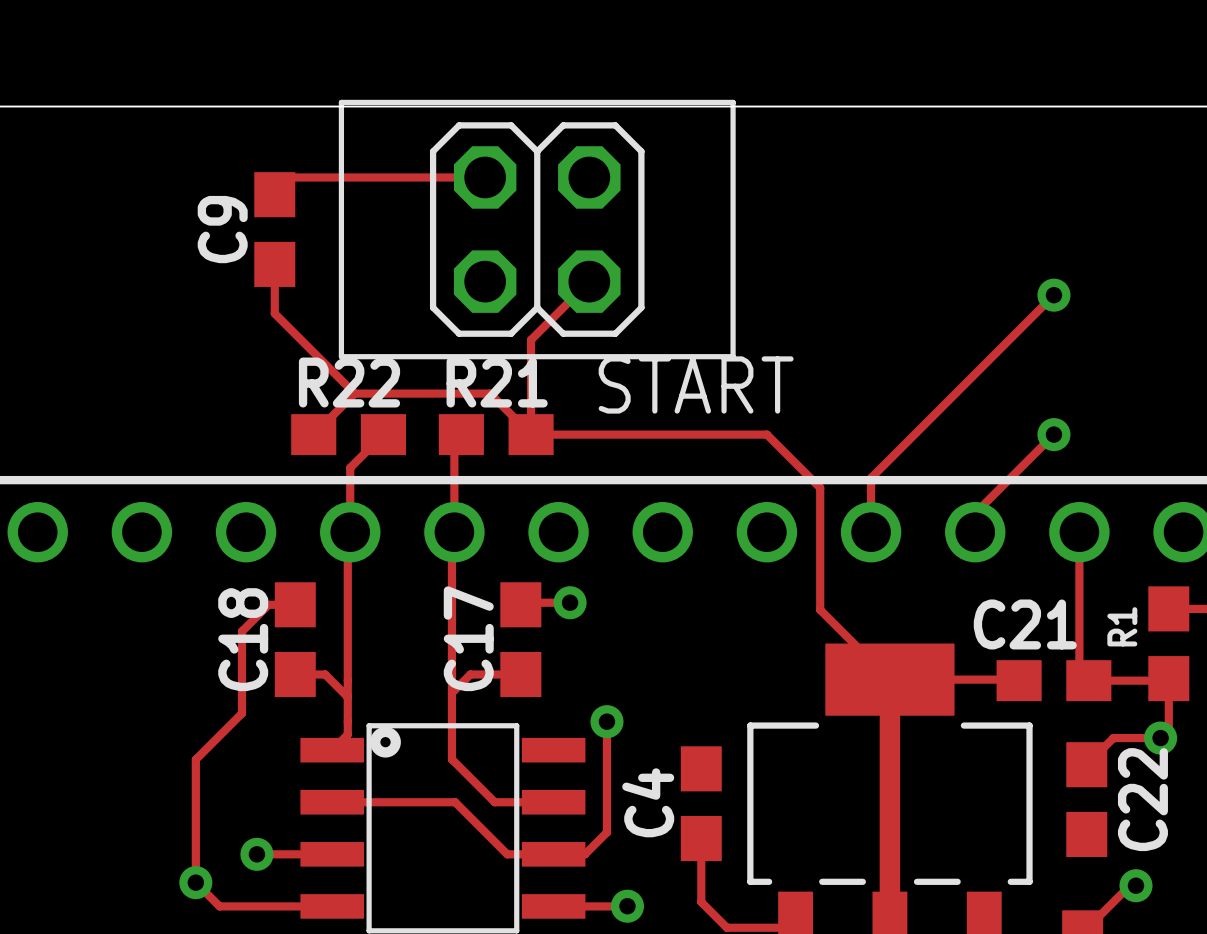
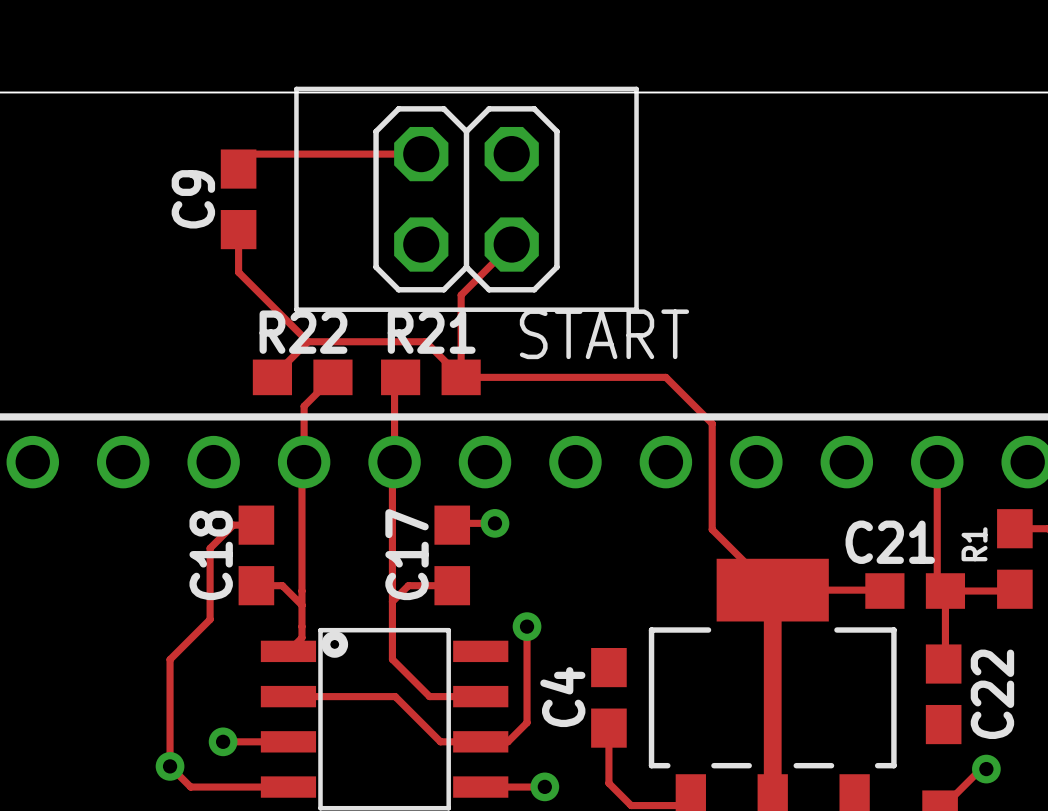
track: (1053, 295) (871, 478) (871, 532) -> none
via: (1053, 295) -> none
track: (1053, 434) (975, 513) (975, 532) -> none
via: (1053, 434) -> none
track: (1168, 678) (1168, 729) (1160, 738) (1113, 738) (1088, 762) -> (945, 591) (945, 662)
via: (1160, 738) -> none

